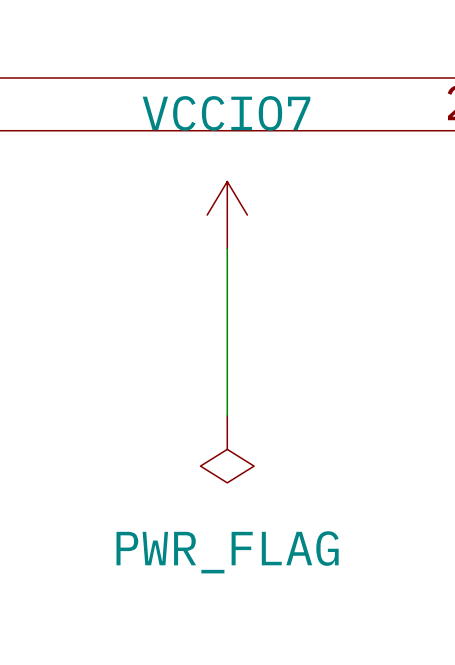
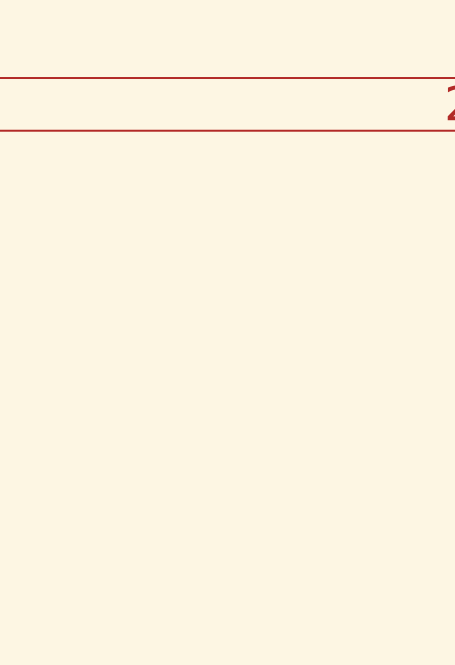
power symbol: VCCIO7 (227, 215) -> none
wire: (227, 248) (227, 415) -> none
power symbol: PWR_FLAG (227, 449) -> none

